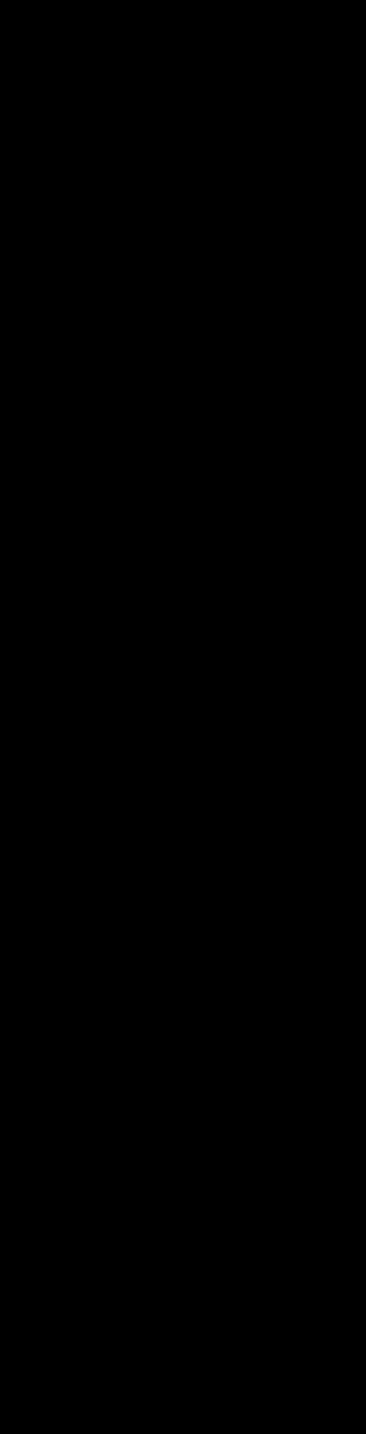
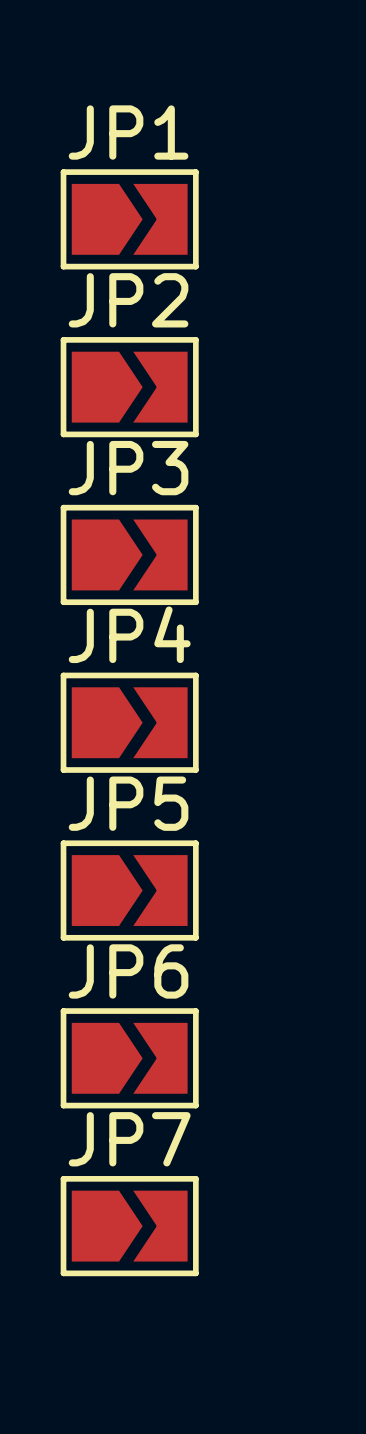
JP1: none -> (129, 219)
JP2: none -> (129, 387)
JP3: none -> (129, 554)
JP4: none -> (129, 722)
JP5: none -> (129, 890)
JP6: none -> (129, 1058)
JP7: none -> (129, 1226)

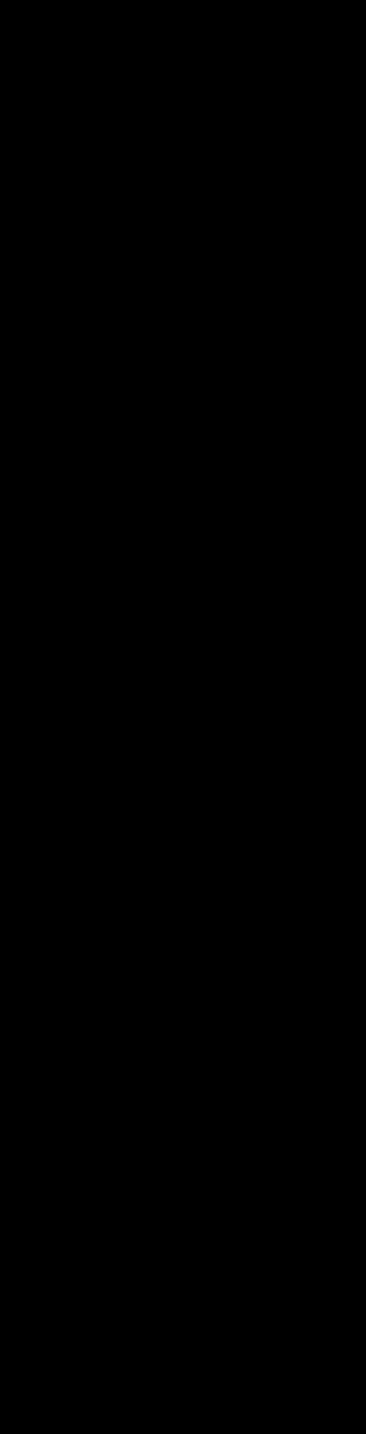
JP1: (129, 219) -> none
JP2: (129, 387) -> none
JP3: (129, 554) -> none
JP4: (129, 722) -> none
JP5: (129, 890) -> none
JP6: (129, 1058) -> none
JP7: (129, 1226) -> none

